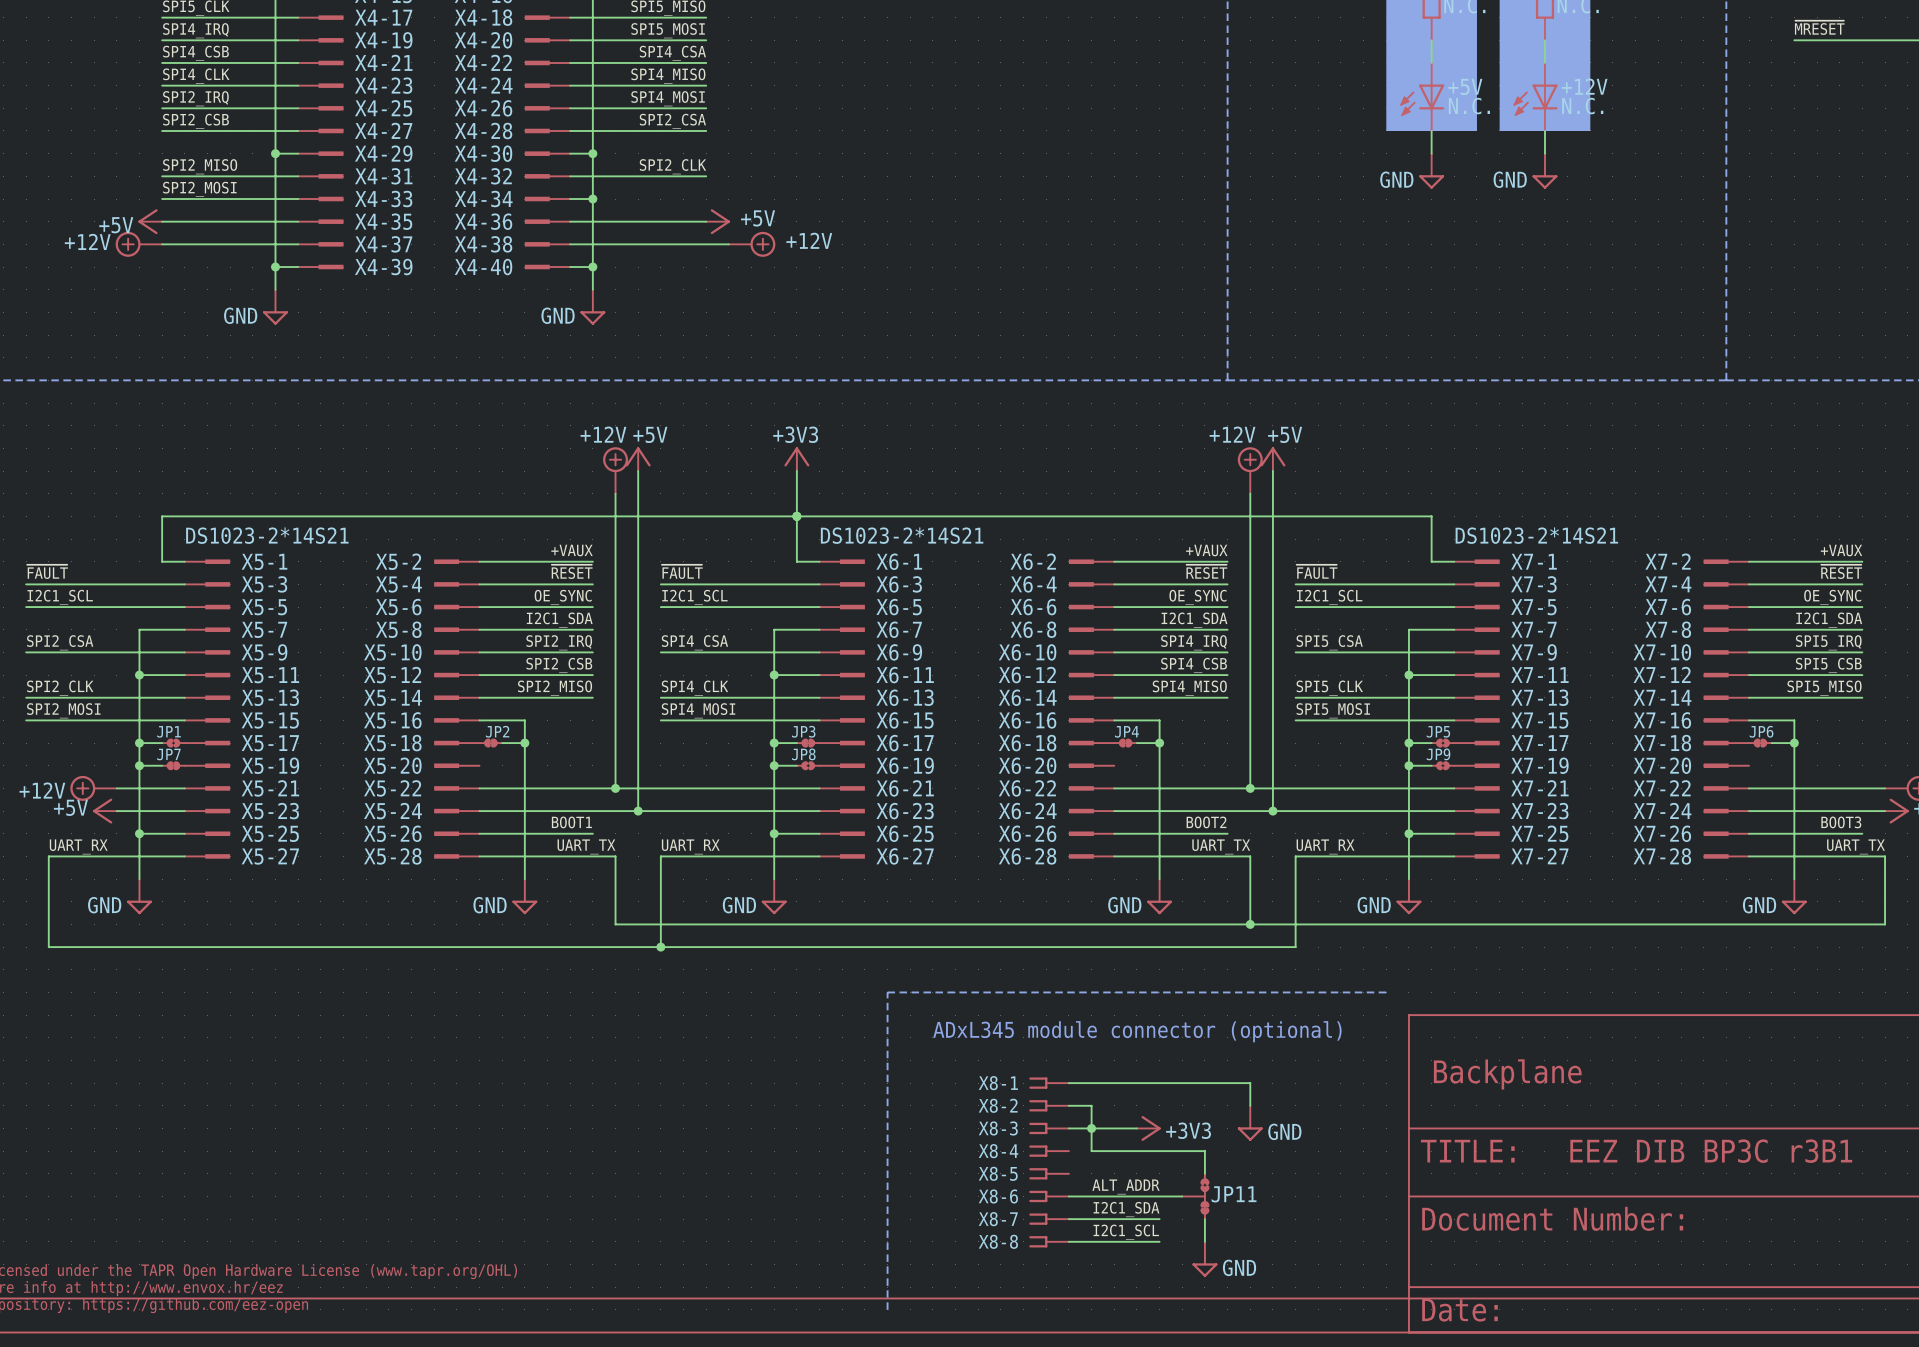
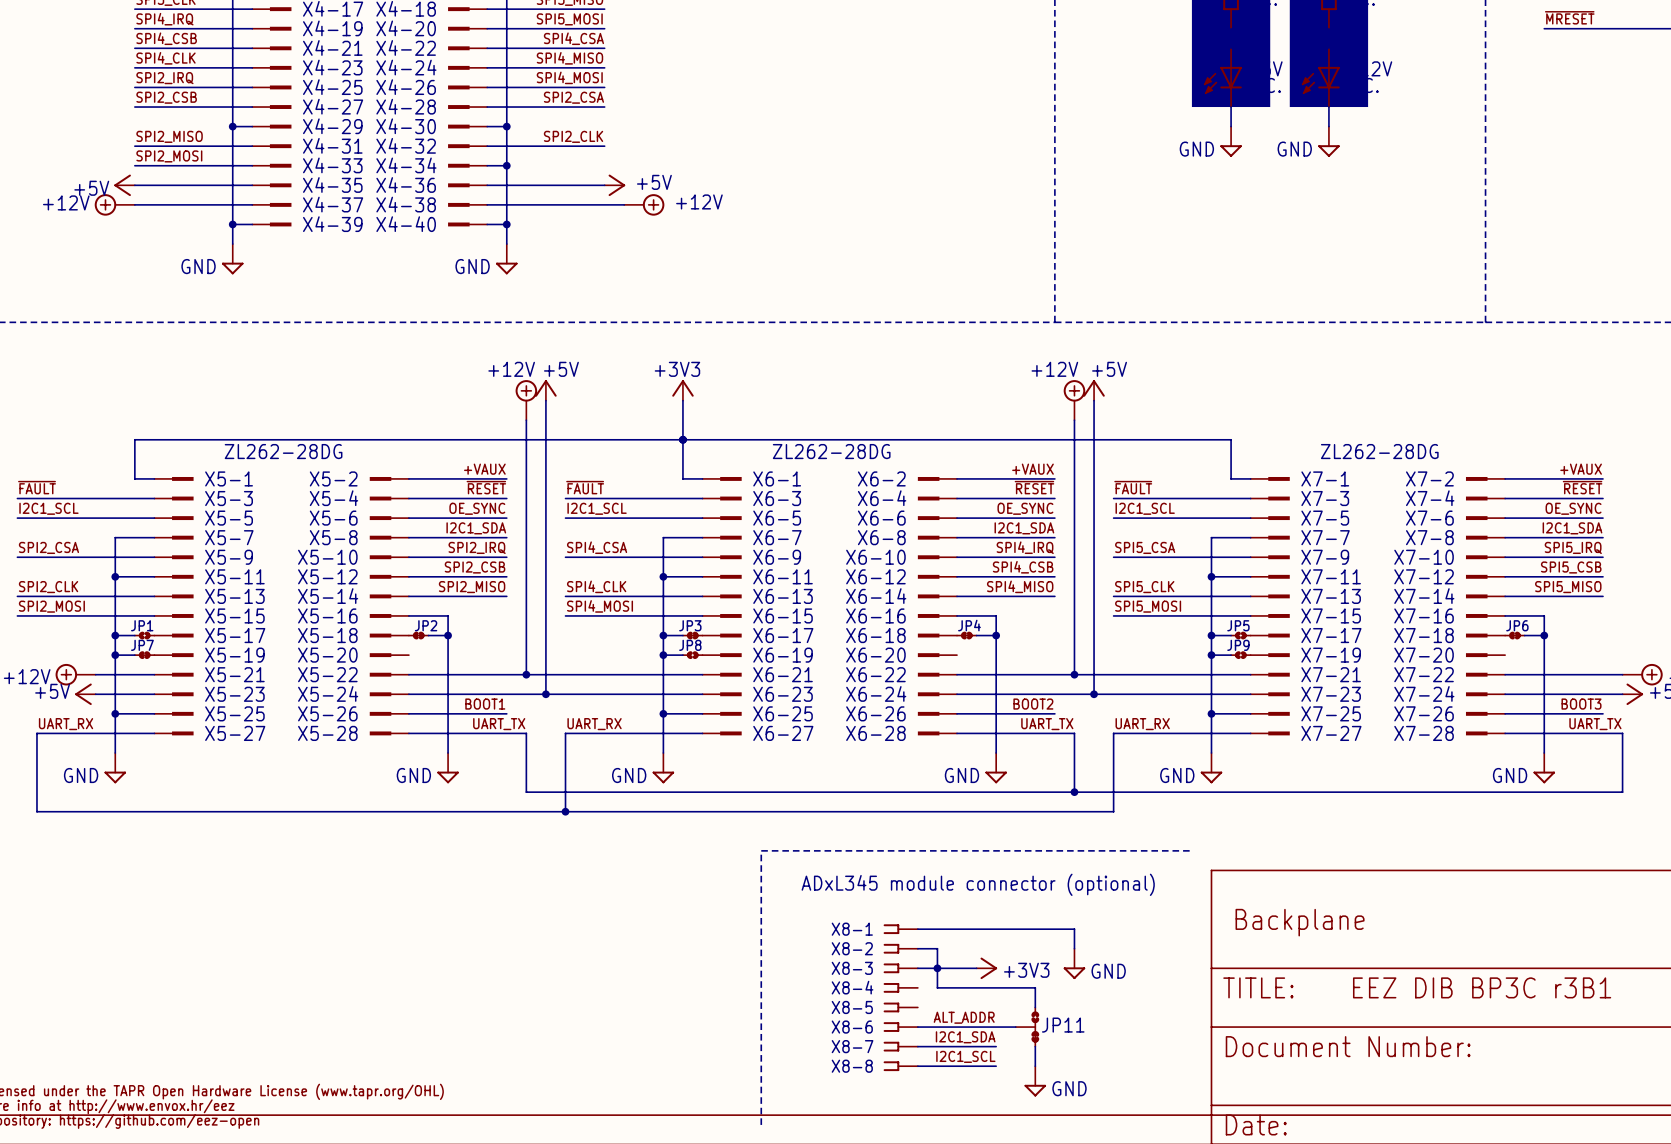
X5-1 value: DS1023-2*14S21 (267, 535) -> ZL262-28DG (283, 451)
X6-1 value: DS1023-2*14S21 (902, 535) -> ZL262-28DG (831, 451)
X7-1 value: DS1023-2*14S21 (1536, 535) -> ZL262-28DG (1379, 451)

